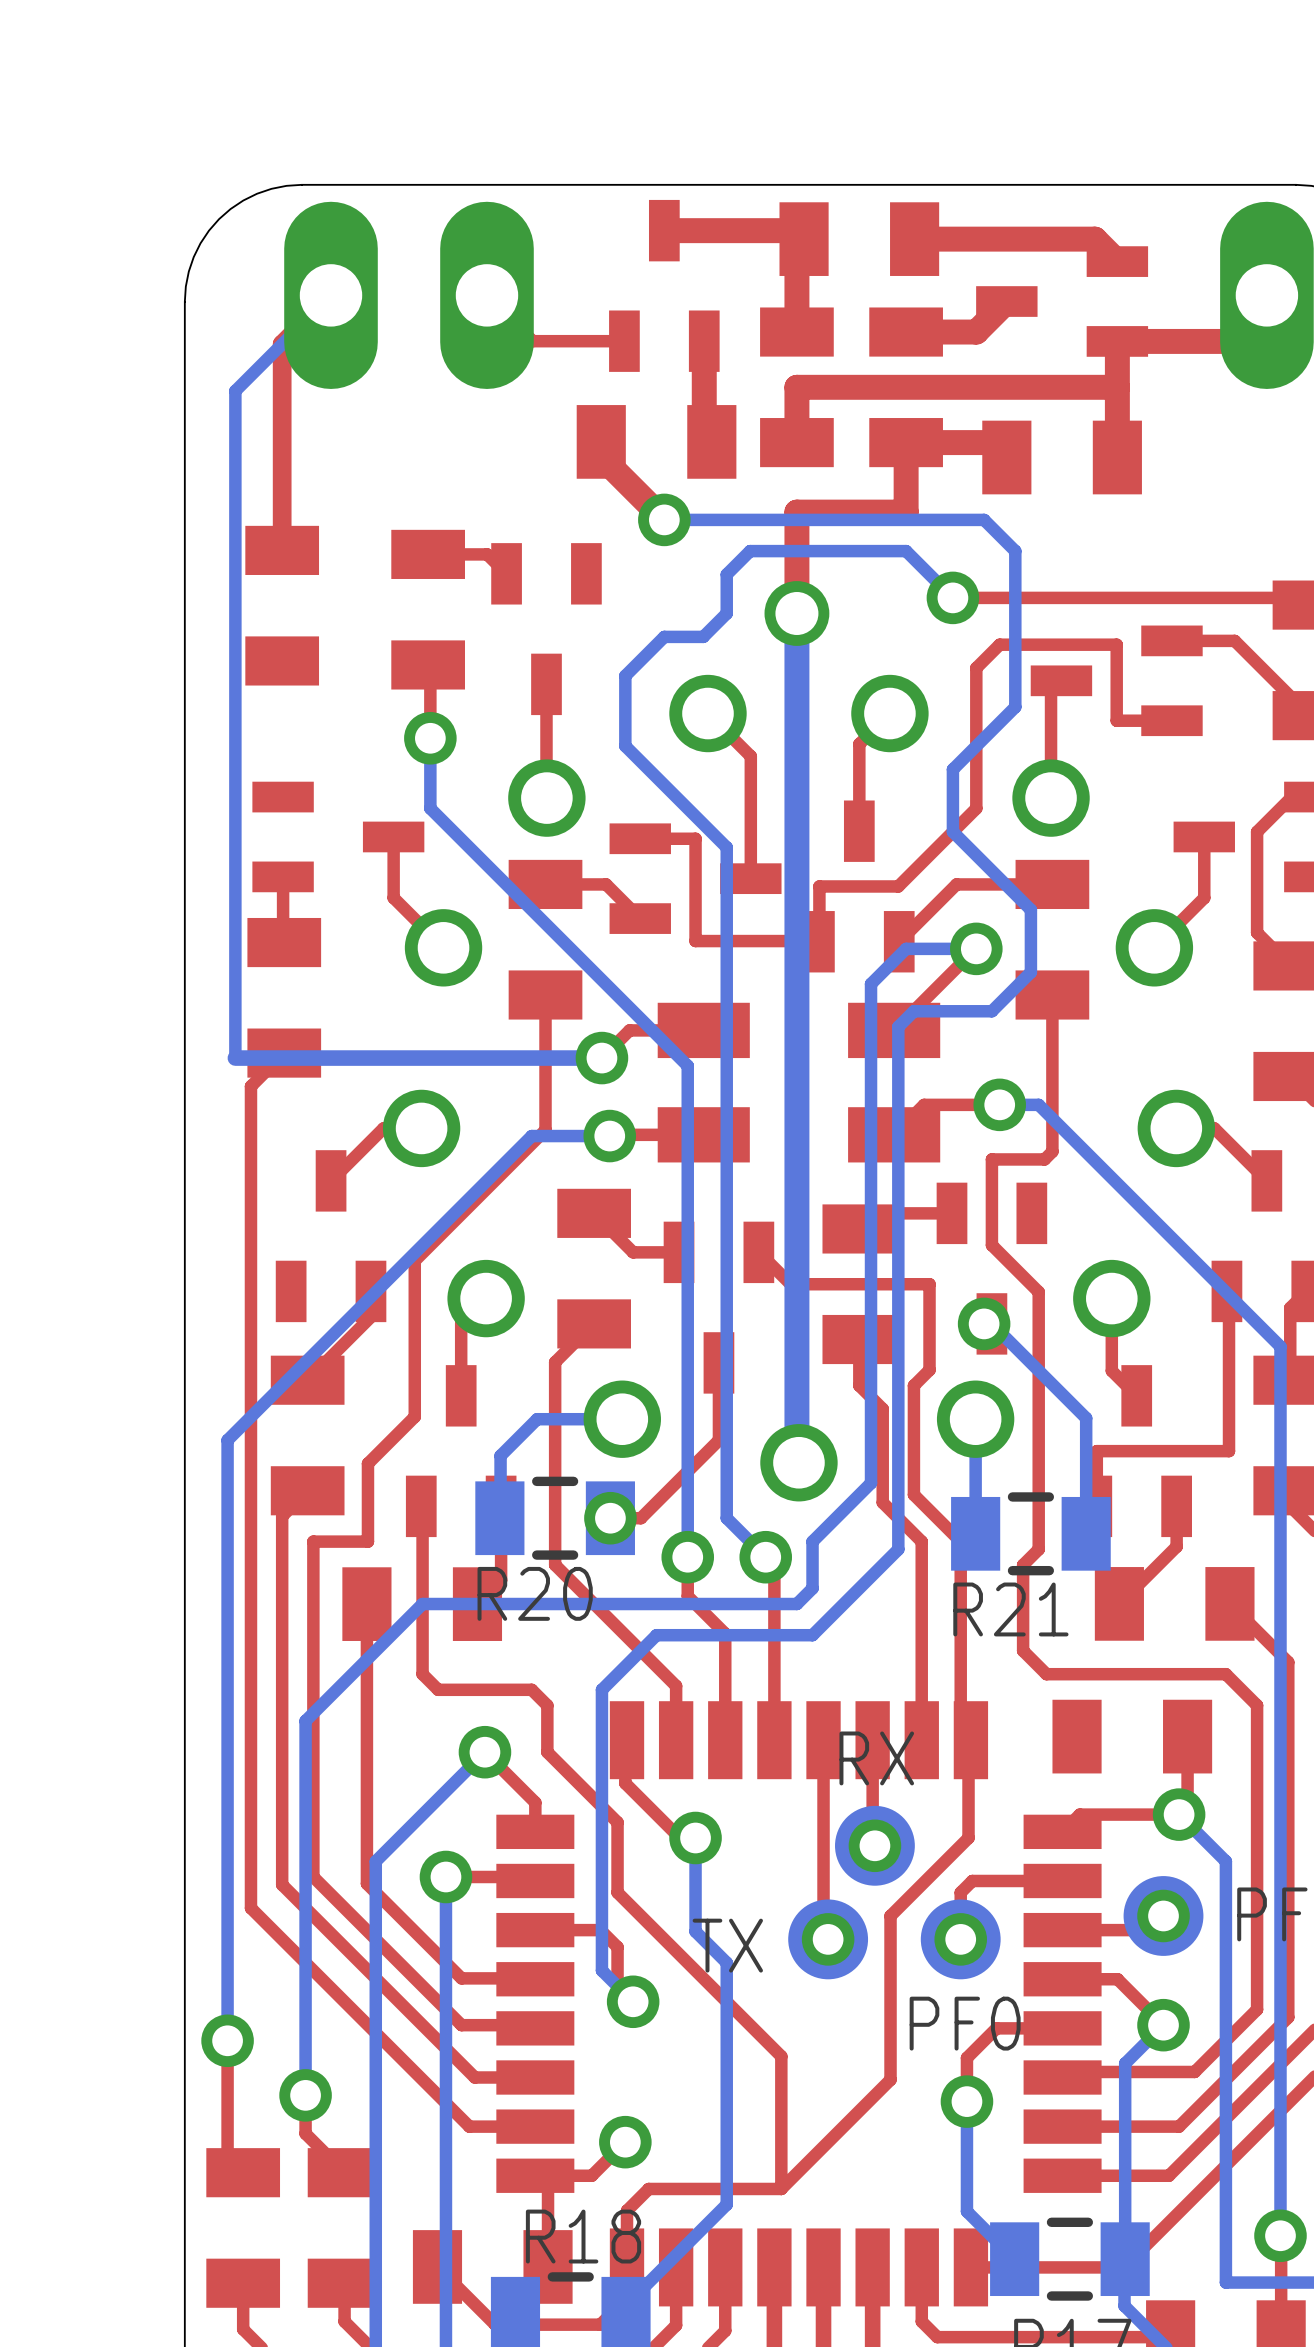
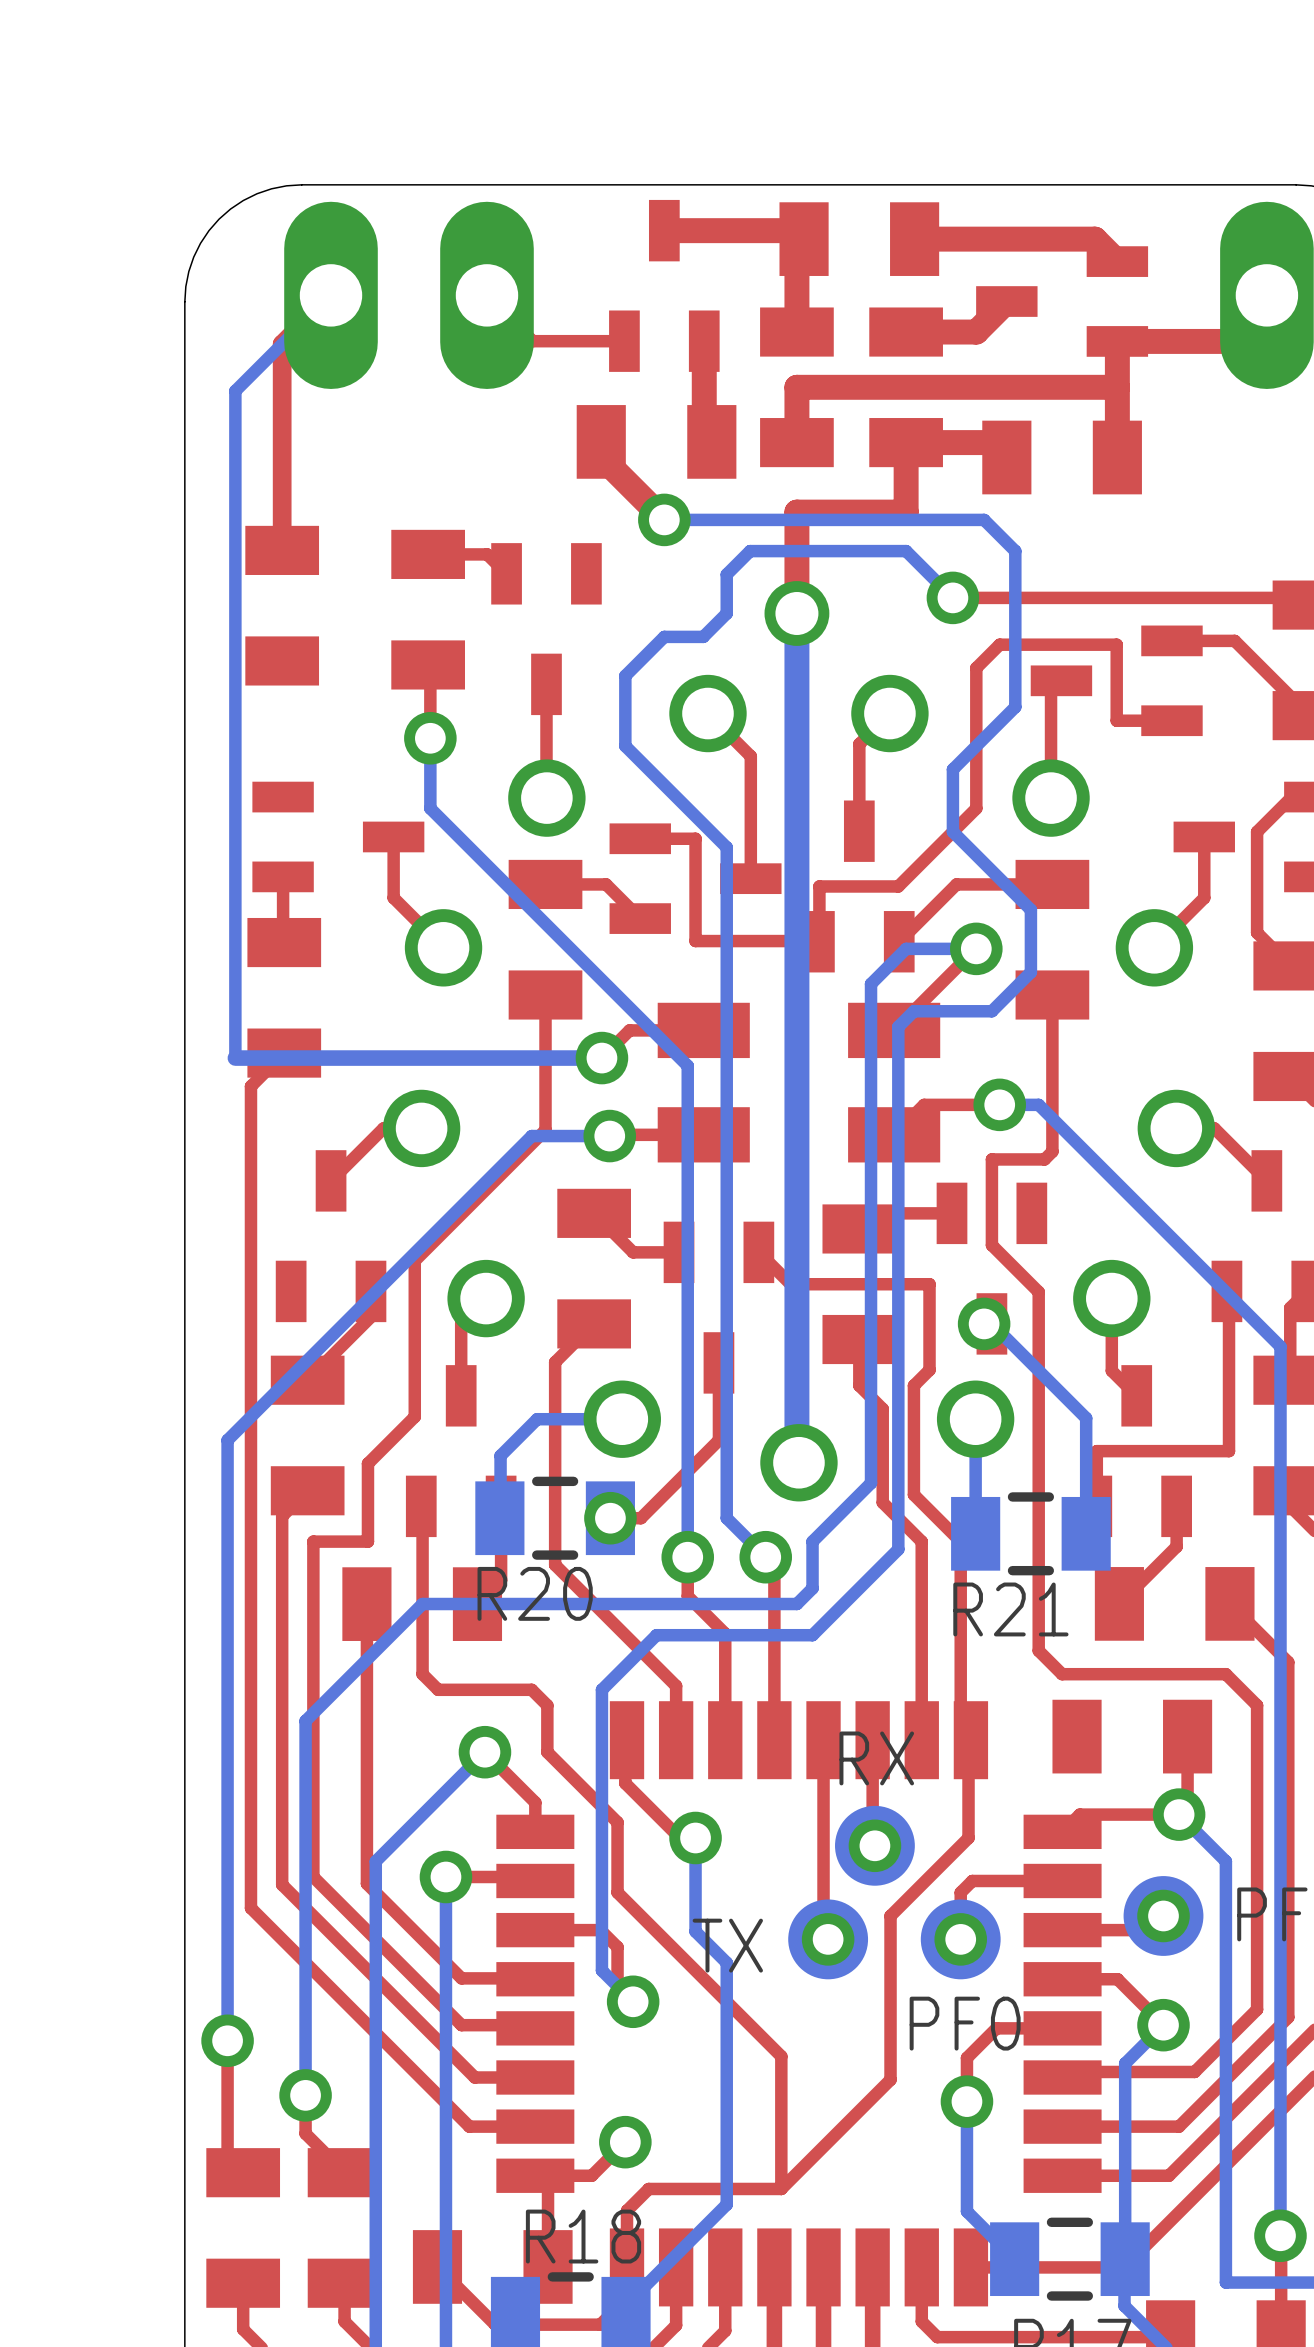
top track: (1038, 1549) (1023, 1565) (1023, 1650) (1046, 1674) (1062, 1674) -> (1038, 1549) (1038, 1650) (1062, 1674)

